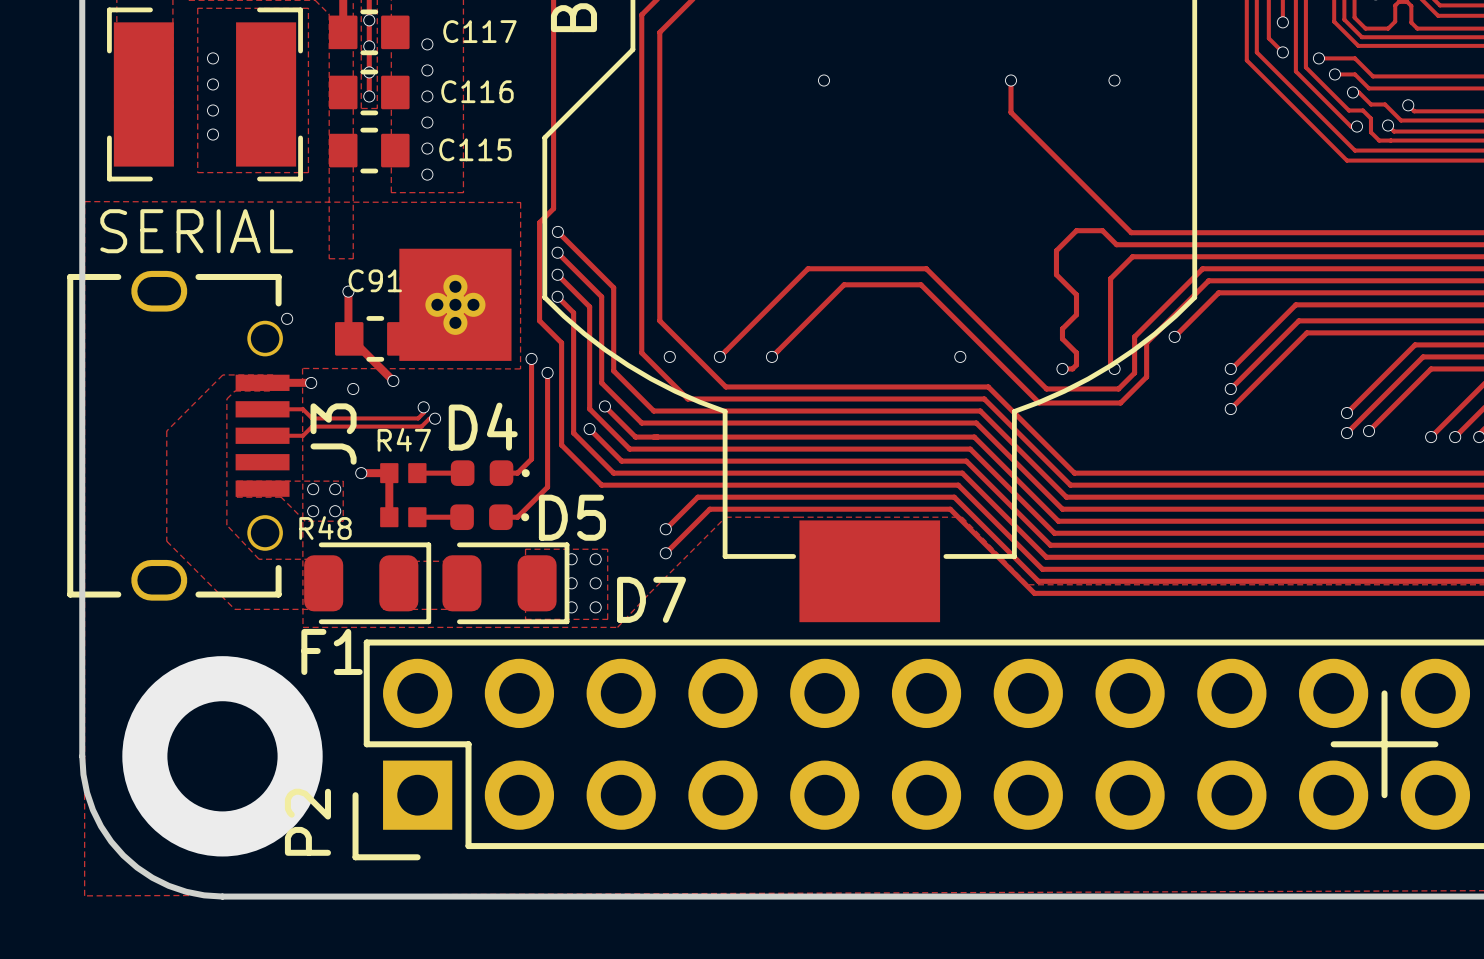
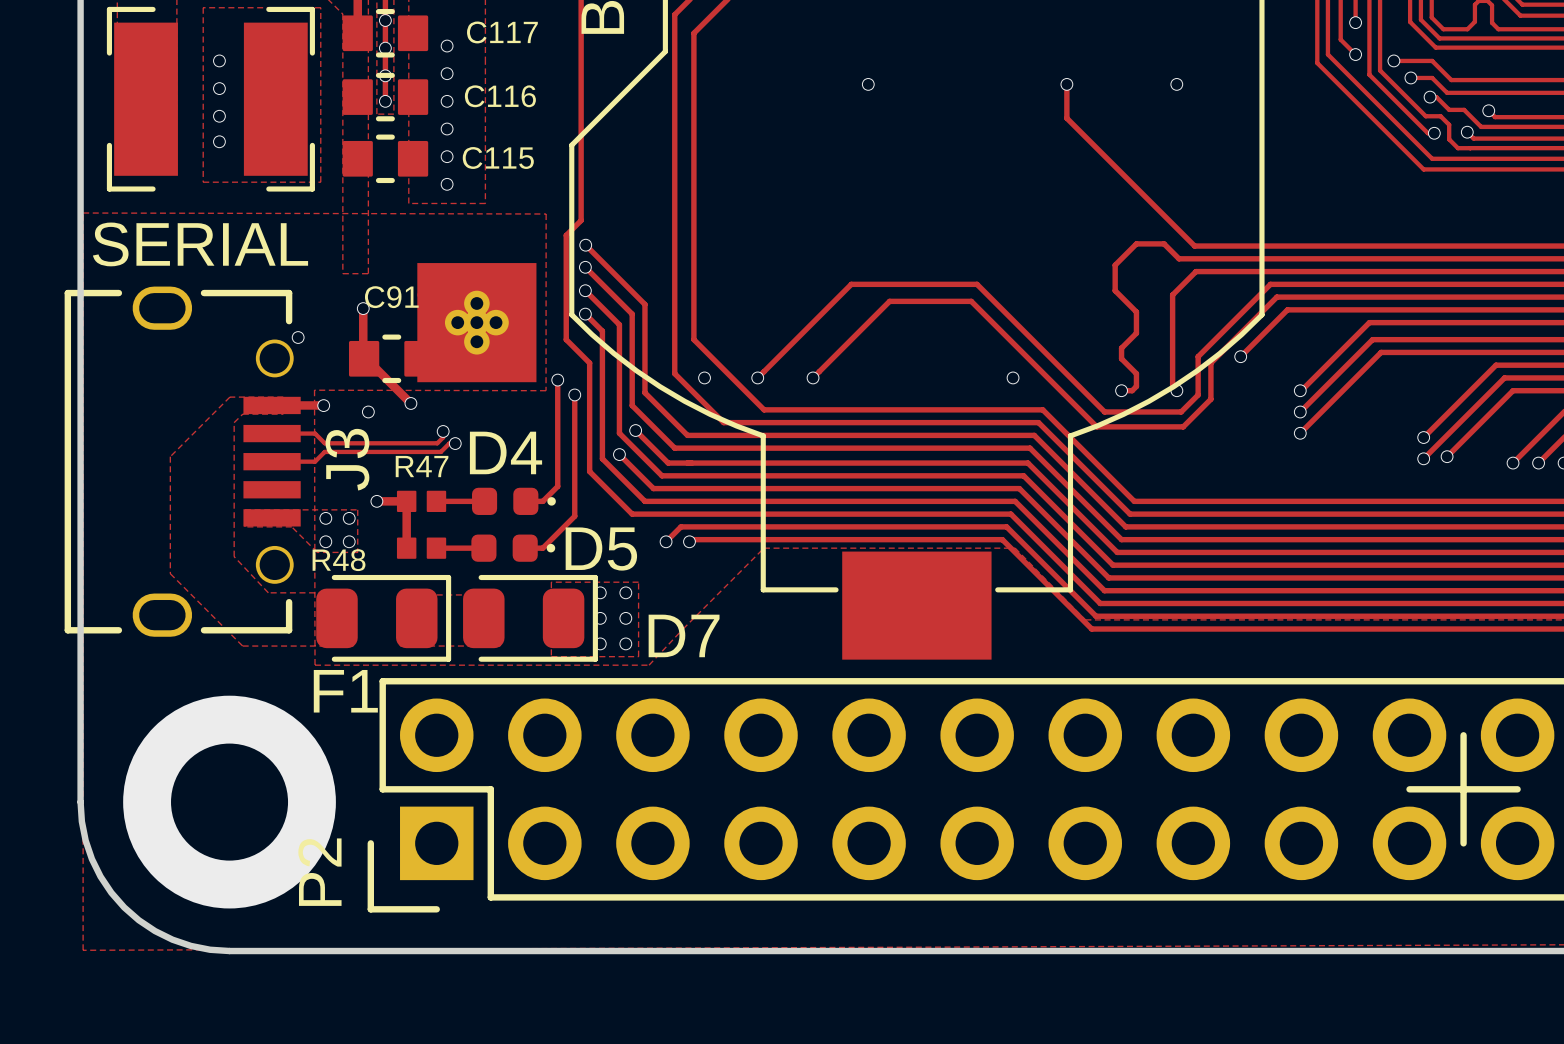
track: (697, 497) (665, 529) -> (734, 526) (680, 526) (666, 541)
track: (709, 509) (665, 553) -> (747, 539) (691, 539) (689, 541)
via: none -> (666, 541)
via: none -> (689, 541)
via: (665, 529) -> none
via: (665, 553) -> none

